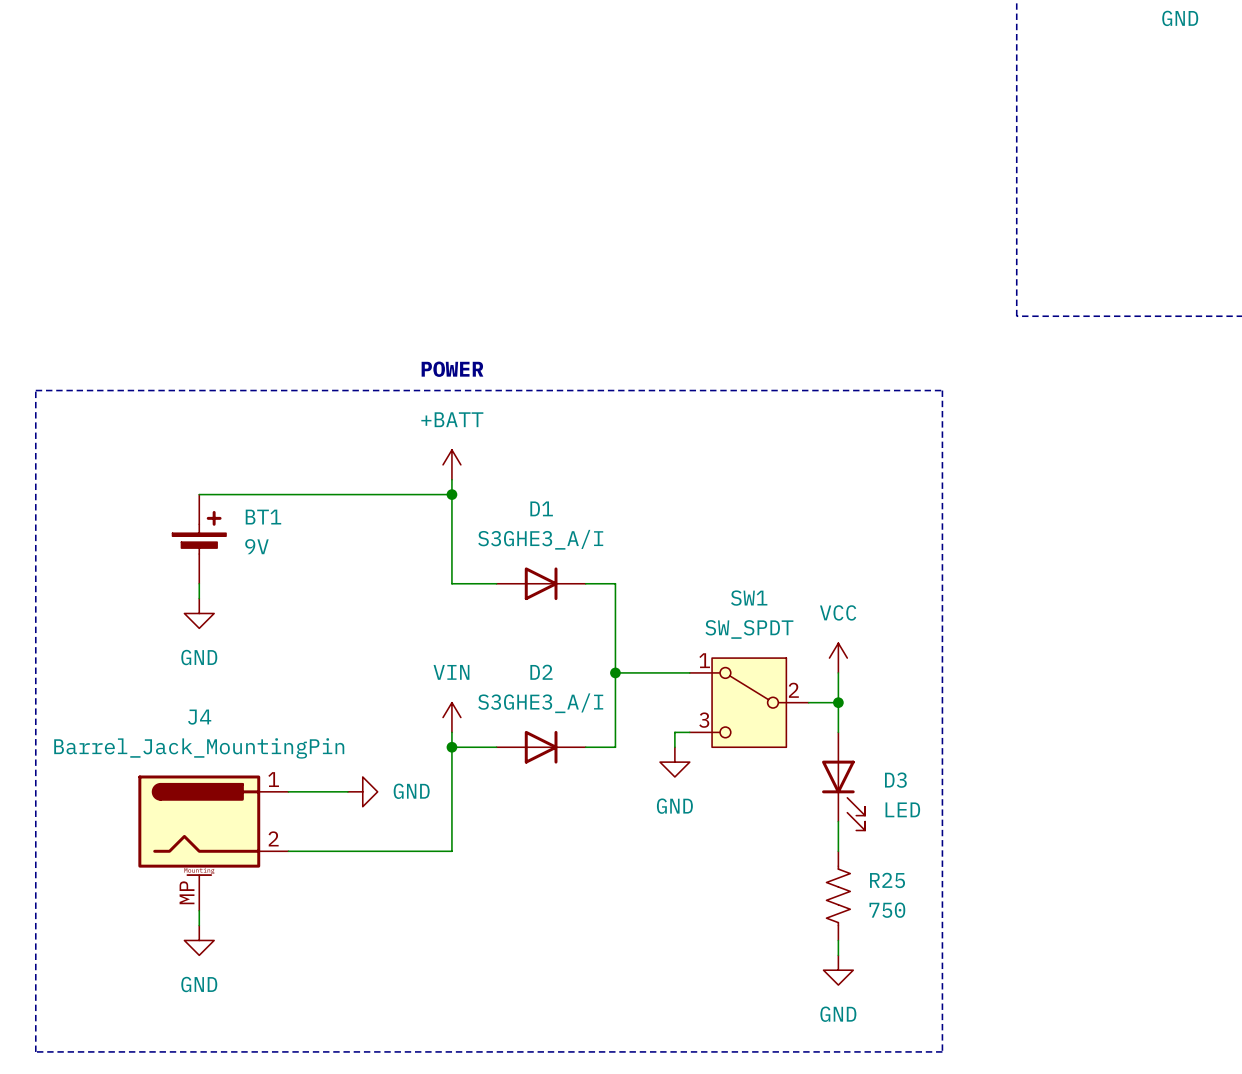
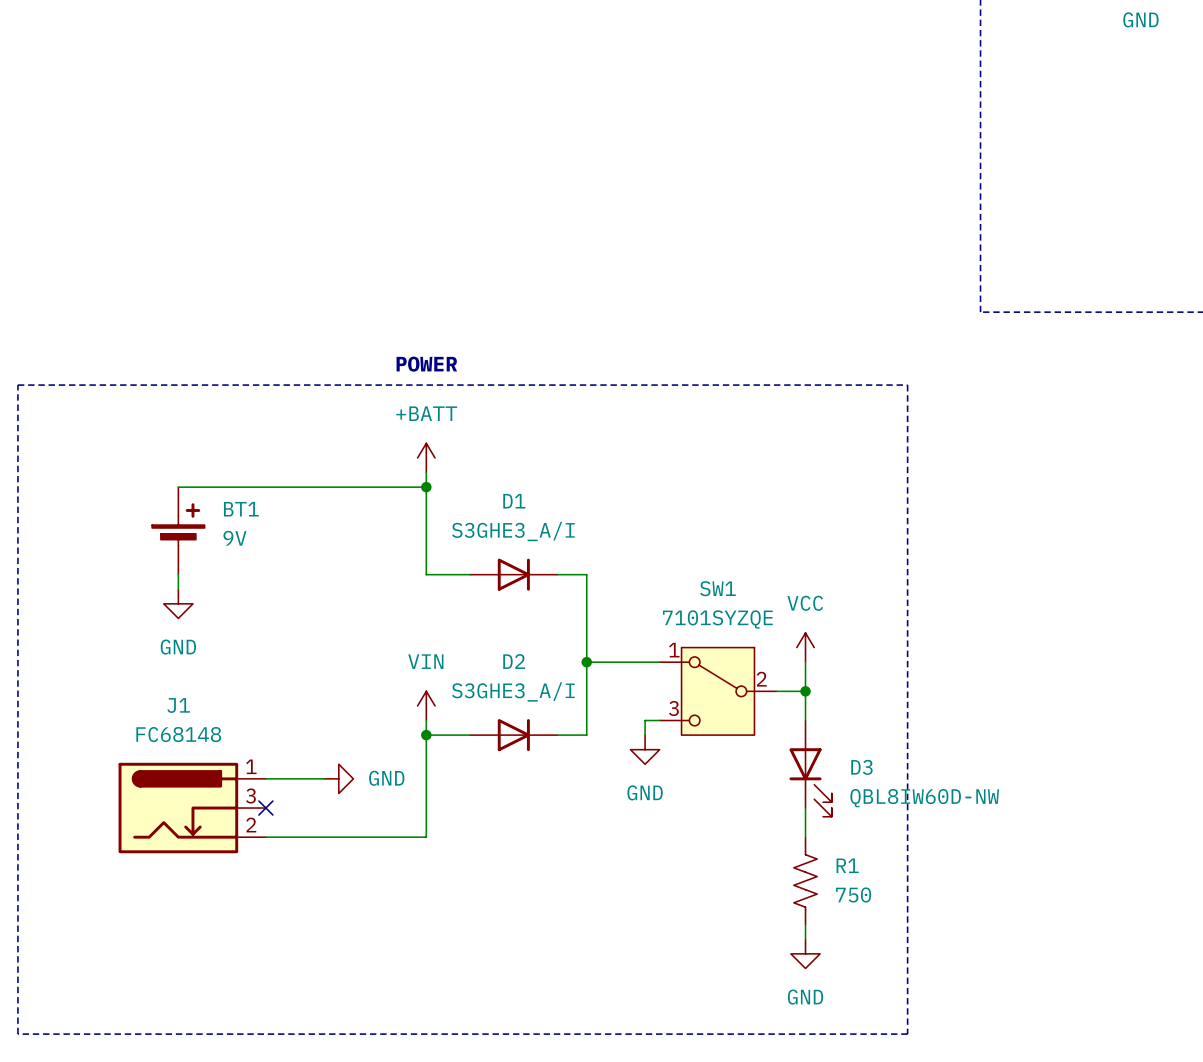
SW1 value: SW_SPDT (749, 629) -> 7101SYZQE (717, 619)
D3 value: LED (902, 809) -> QBL8IW60D-NW (924, 798)
J1: none -> FC68148 (192, 808)
no-connect mark: none -> (265, 808)
J4: Barrel_Jack_MountingPin (213, 843) -> none
R25 name: R25 (887, 880) -> R1 (847, 865)
wire: (199, 910) (199, 925) -> none
power symbol: GND (199, 940) -> none

